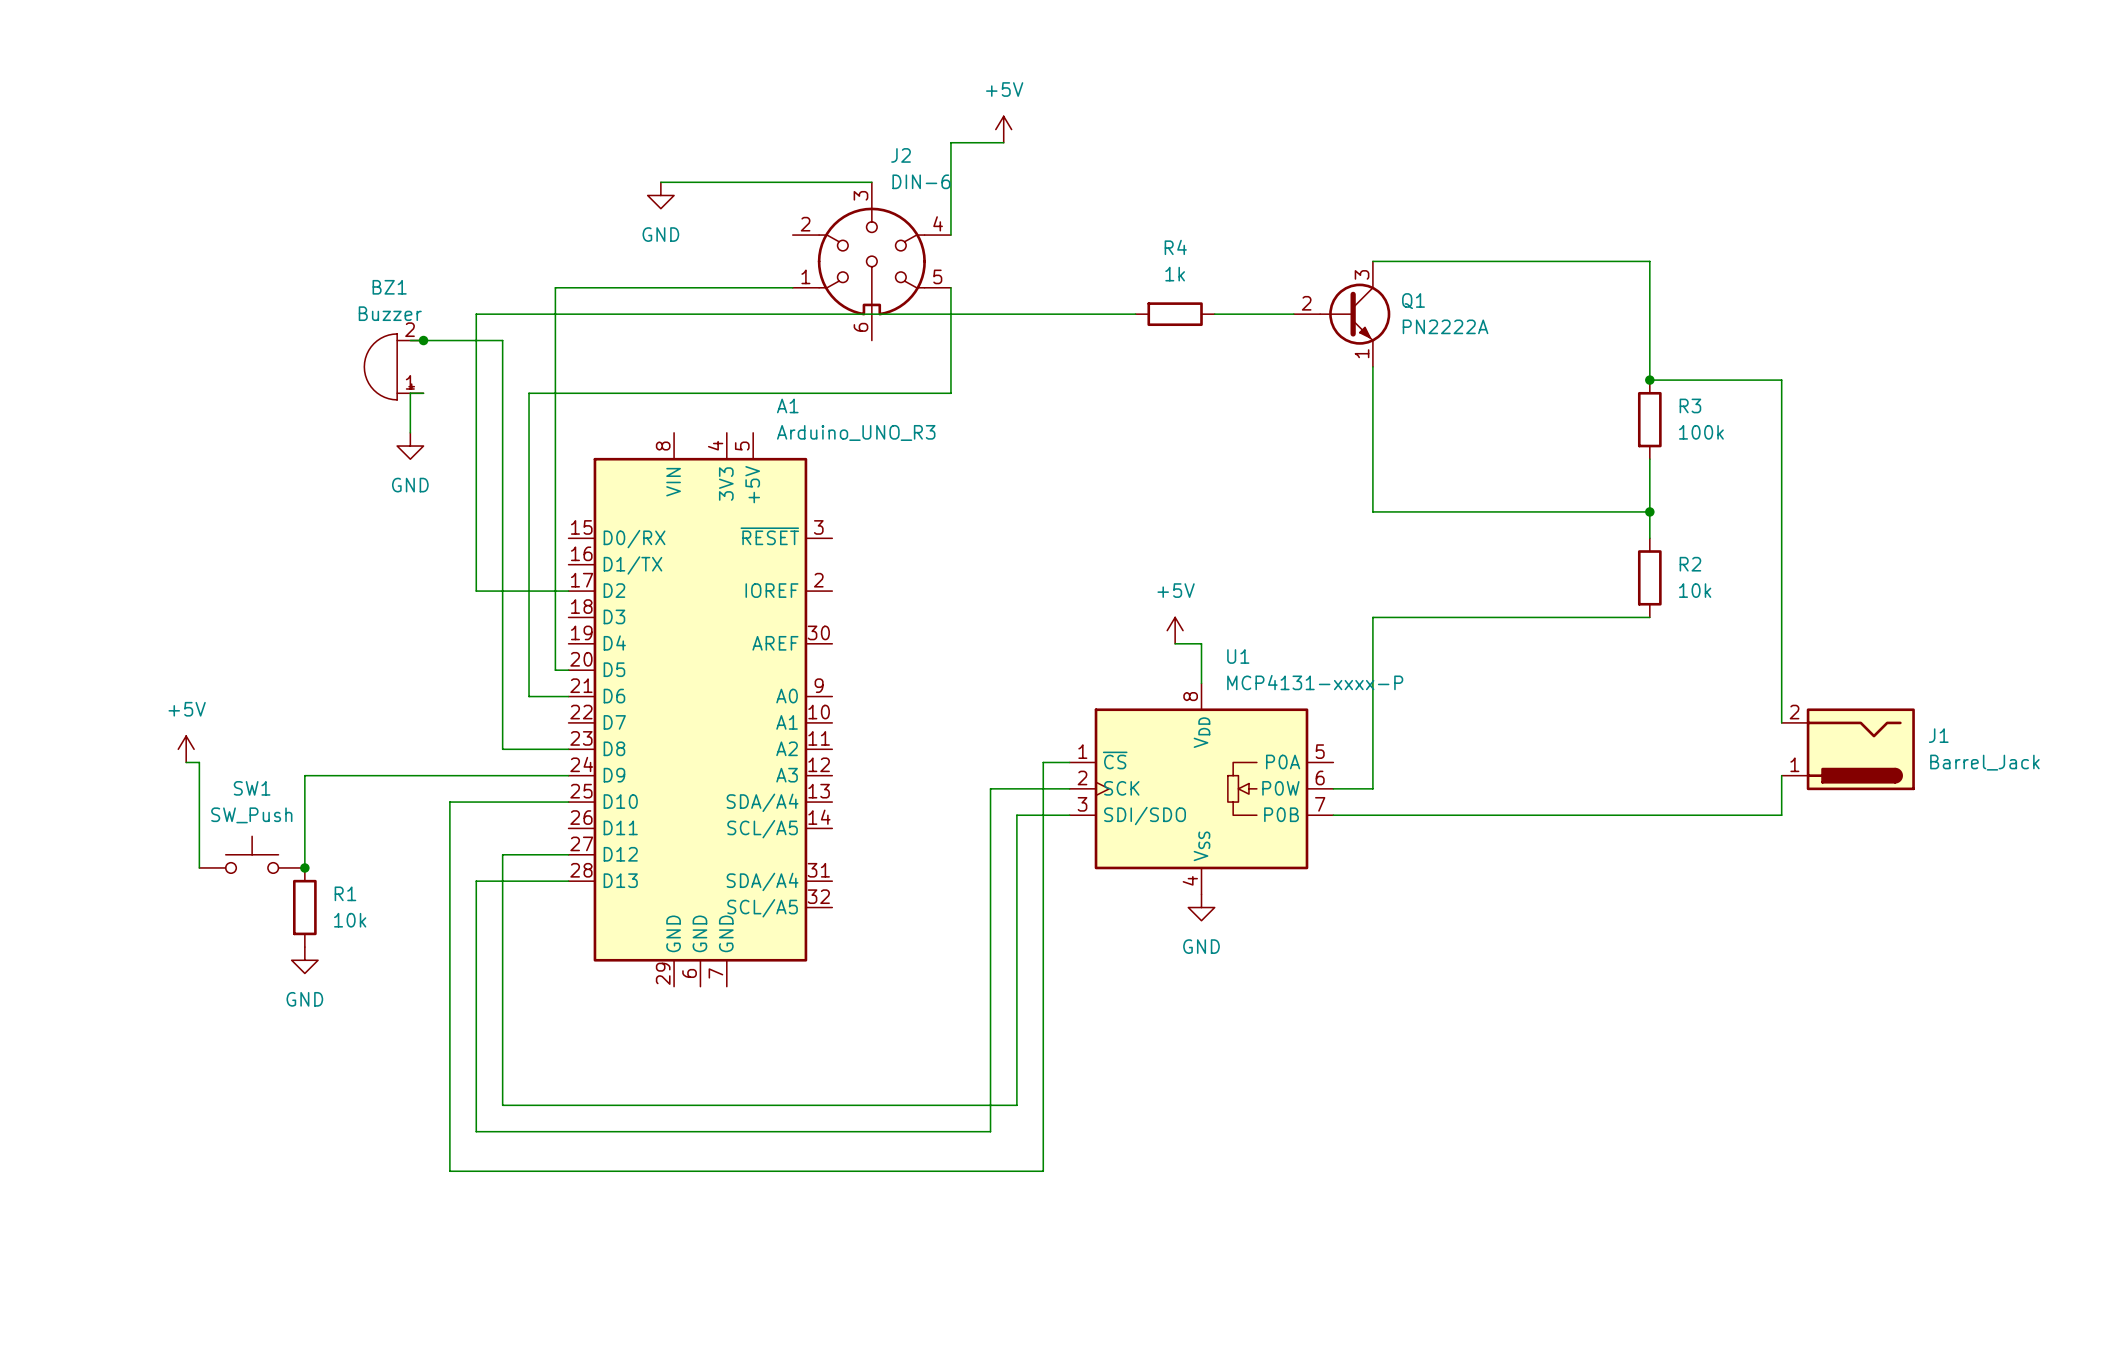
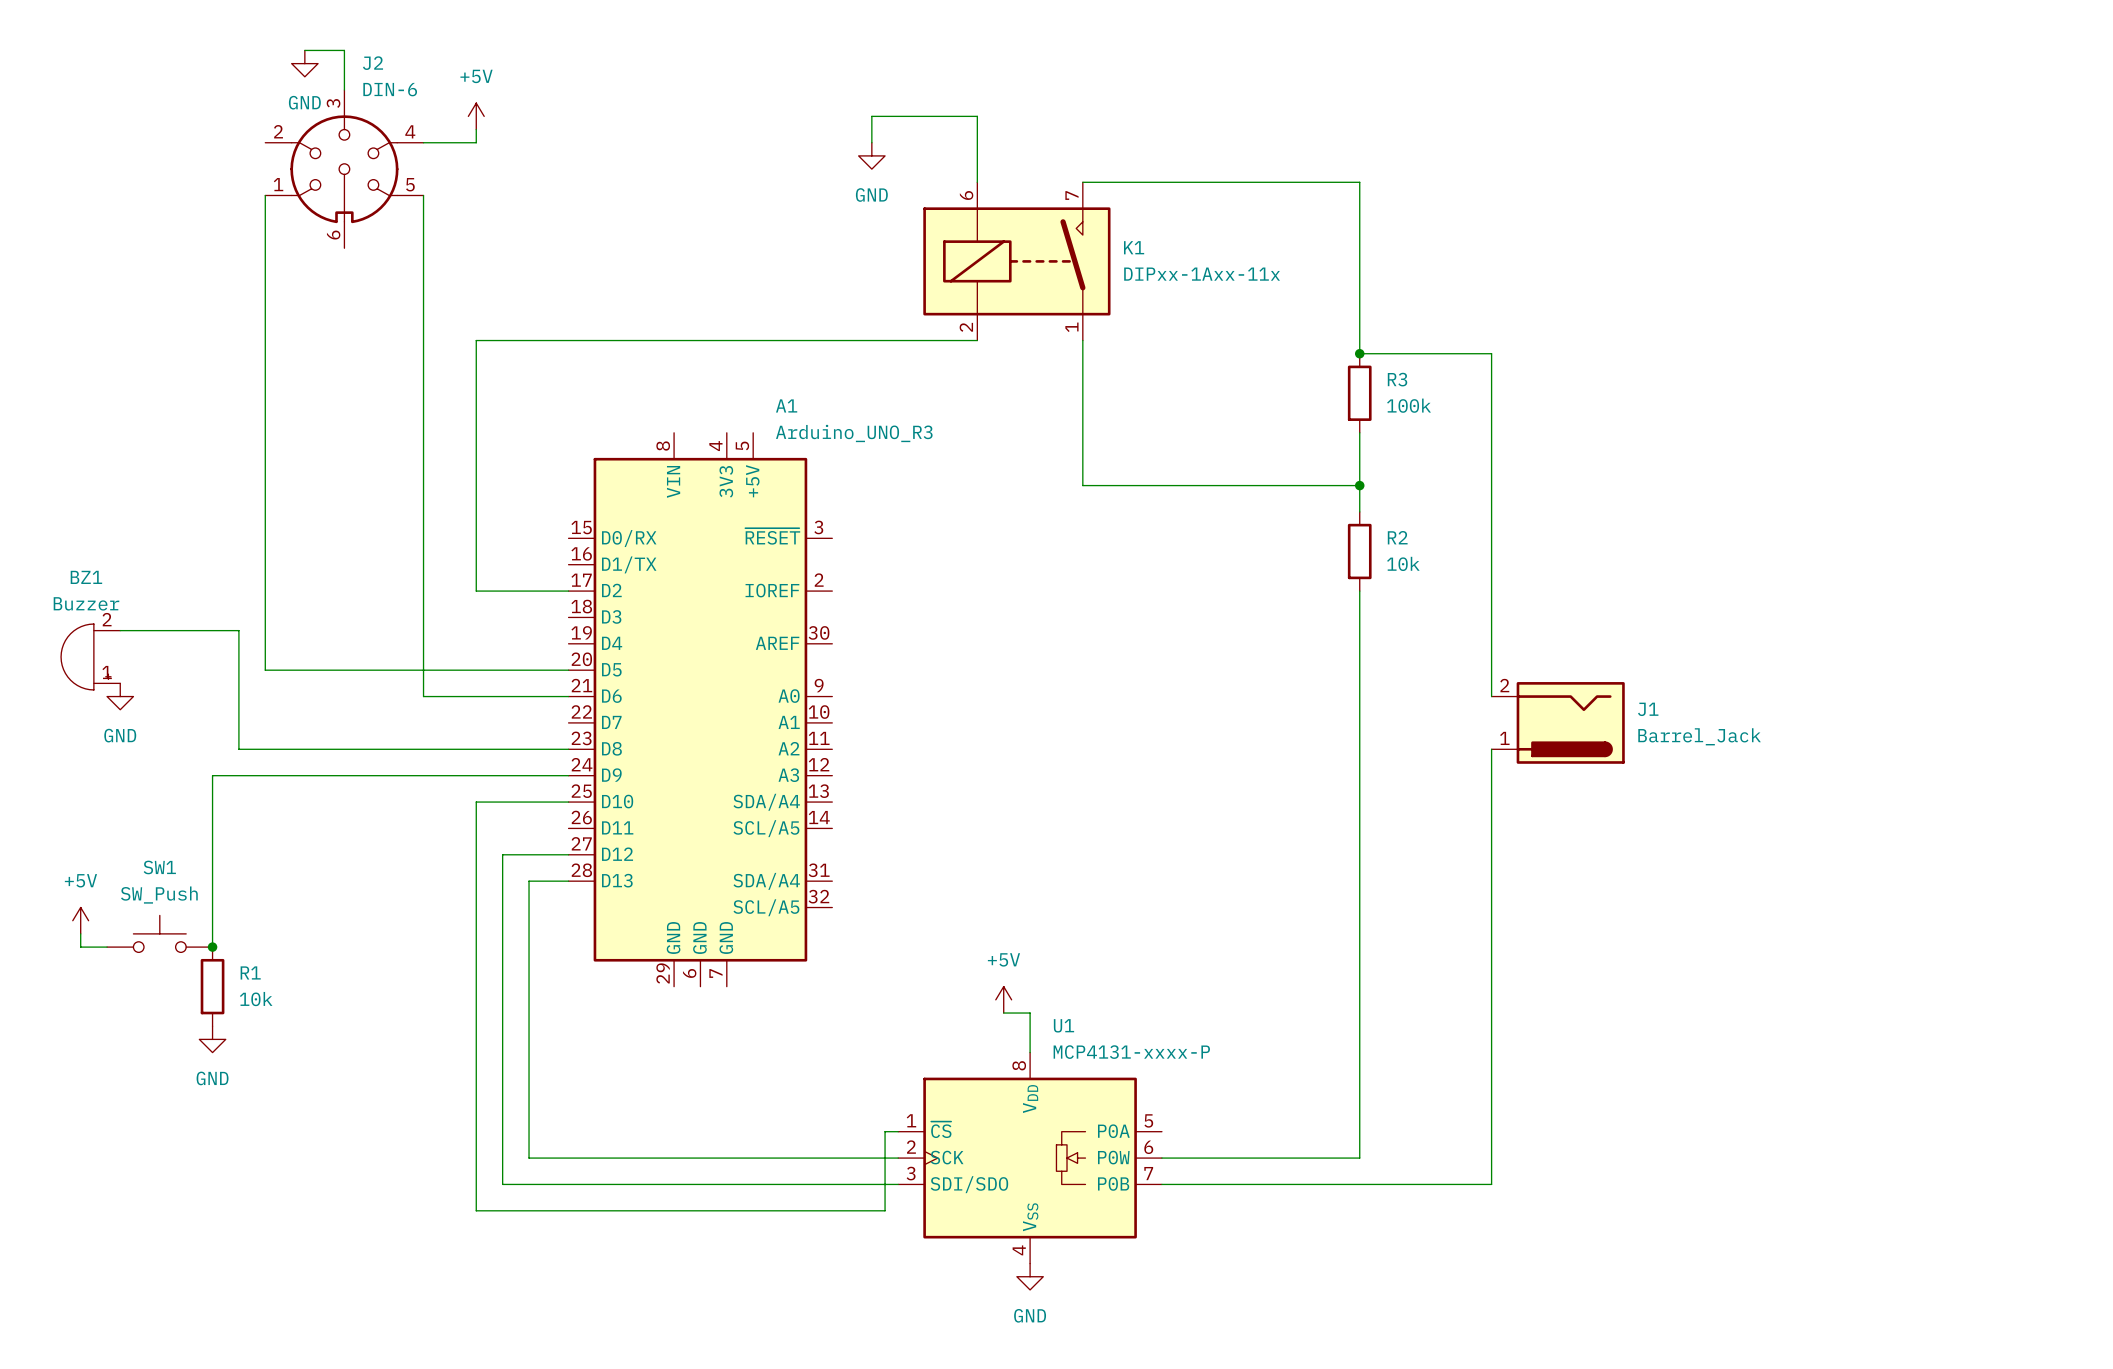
wire: none -> (304, 50) (344, 50) (344, 90)
power symbol: none -> GND (304, 63)
power symbol: none -> +5V (476, 116)
wire: none -> (476, 129) (476, 142) (423, 142)
power symbol: +5V (1003, 129) -> none
wire: none -> (871, 142) (871, 116) (977, 116) (977, 182)
wire: (1003, 142) (950, 142) (950, 235) -> none
power symbol: none -> GND (871, 155)
wire: (660, 182) (871, 182) -> none
wire: none -> (1082, 182) (1359, 182) (1359, 353) (1491, 353) (1491, 696)
power symbol: GND (660, 195) -> none
J2 position: (871, 261) -> (344, 169)
K1: none -> DIPxx-1Axx-11x (1016, 261)
wire: (1372, 261) (1649, 261) (1649, 380) (1781, 380) (1781, 722) -> none
wire: (792, 287) (555, 287) (555, 670) -> (265, 195) (265, 670) (555, 670)
wire: (950, 287) (950, 393) (529, 393) (529, 696) -> (423, 195) (423, 696) (529, 696)
wire: (1135, 314) (476, 314) (476, 340) (410, 340) -> none
R4: 1k (1175, 314) -> none
wire: (1214, 314) (1293, 314) -> none
Q1: PN2222A (1342, 314) -> none
junction: (423, 340) -> none
wire: (502, 340) (502, 749) -> (120, 630) (238, 630) (238, 749) (502, 749)
wire: none -> (502, 340) (977, 340)
wire: none -> (1082, 340) (1082, 485) (1359, 485)
junction: none -> (1359, 353)
BZ1 position: (393, 366) -> (90, 656)
wire: (1372, 366) (1372, 511) (1649, 511) -> none
junction: (1649, 380) -> none
wire: (423, 393) (410, 393) (410, 432) -> none
R3 position: (1649, 419) -> (1359, 393)
wire: none -> (1359, 432) (1359, 511)
power symbol: GND (410, 446) -> none
wire: (1649, 459) (1649, 538) -> none
junction: none -> (1359, 485)
junction: (1649, 511) -> none
R2 position: (1649, 577) -> (1359, 551)
wire: none -> (1359, 591) (1359, 1158) (1161, 1158)
wire: (1649, 617) (1372, 617) (1372, 788) (1333, 788) -> none
power symbol: +5V (1175, 630) -> none
wire: (1175, 643) (1201, 643) (1201, 683) -> none
power symbol: none -> GND (120, 696)
power symbol position: +5V (186, 749) -> +5V (80, 920)
wire: none -> (1491, 749) (1491, 1184) (1161, 1184)
J1 position: (1848, 749) -> (1558, 722)
wire: (186, 762) (199, 762) (199, 867) -> none
wire: (1069, 762) (1043, 762) (1043, 1171) (449, 1171) (449, 802) (476, 802) -> none
wire: (304, 775) (304, 867) -> (304, 775) (212, 775) (212, 947)
wire: (1781, 775) (1781, 815) (1333, 815) -> none
wire: (1069, 788) (990, 788) (990, 1131) (898, 1131) -> none
U1 position: (1201, 788) -> (1030, 1158)
wire: (1069, 815) (1016, 815) (1016, 1105) (502, 1105) -> (898, 1184) (502, 1184) (502, 1105)
SW1 position: (252, 854) -> (159, 933)
junction: (304, 867) -> none
wire: (476, 881) (529, 881) -> (476, 881) (476, 802)
wire: none -> (529, 881) (529, 1158) (898, 1158)
R1 position: (304, 907) -> (212, 986)
power symbol: GND (1201, 907) -> none
wire: none -> (80, 933) (80, 947) (107, 947)
junction: none -> (212, 947)
power symbol position: GND (304, 960) -> GND (212, 1039)
power symbol: none -> +5V (1003, 999)
wire: none -> (1003, 1013) (1030, 1013) (1030, 1052)
wire: (476, 1131) (885, 1131) -> (476, 1131) (476, 1210) (885, 1210) (885, 1131)
power symbol: none -> GND (1030, 1276)

